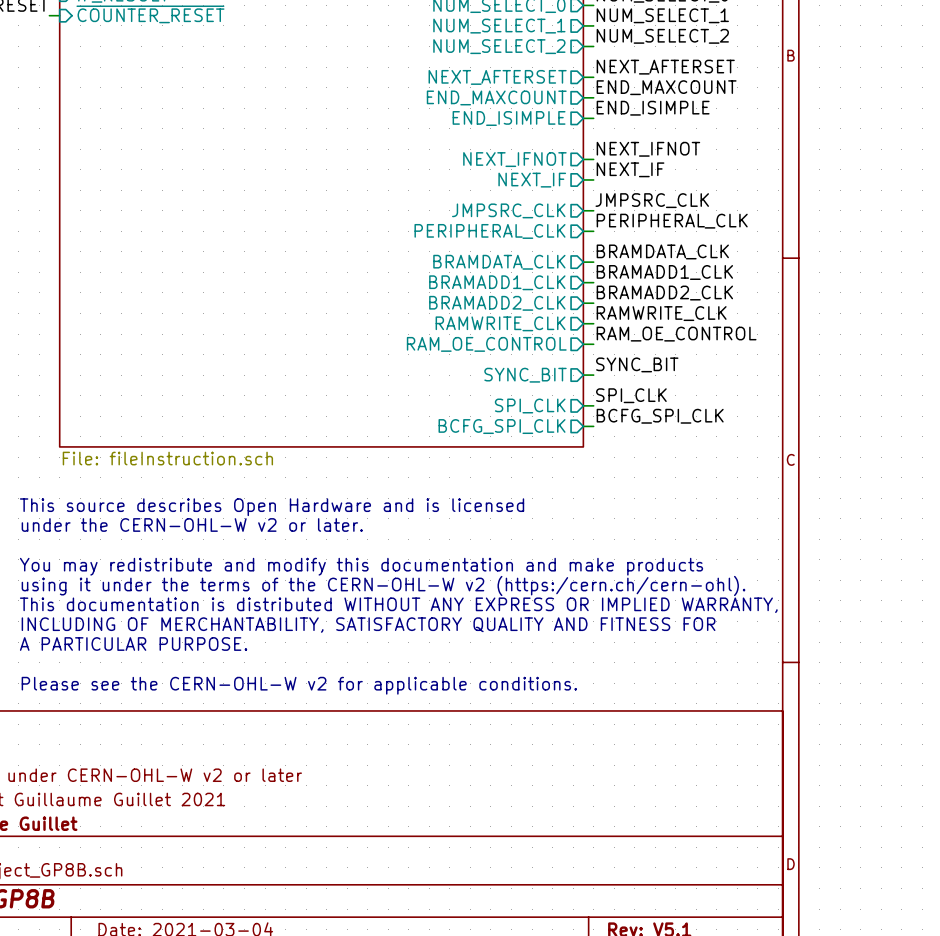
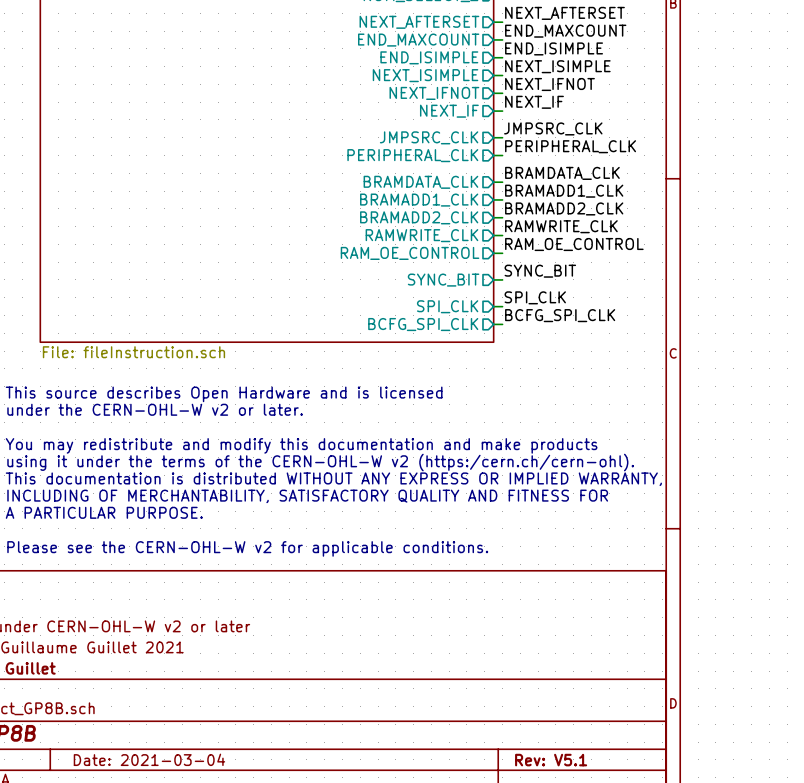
label: none -> NEXT_ISIMPLE (557, 66)
wire: none -> (493, 75) (502, 75)
sheet pin: none -> NEXT_ISIMPLE (425, 75)

